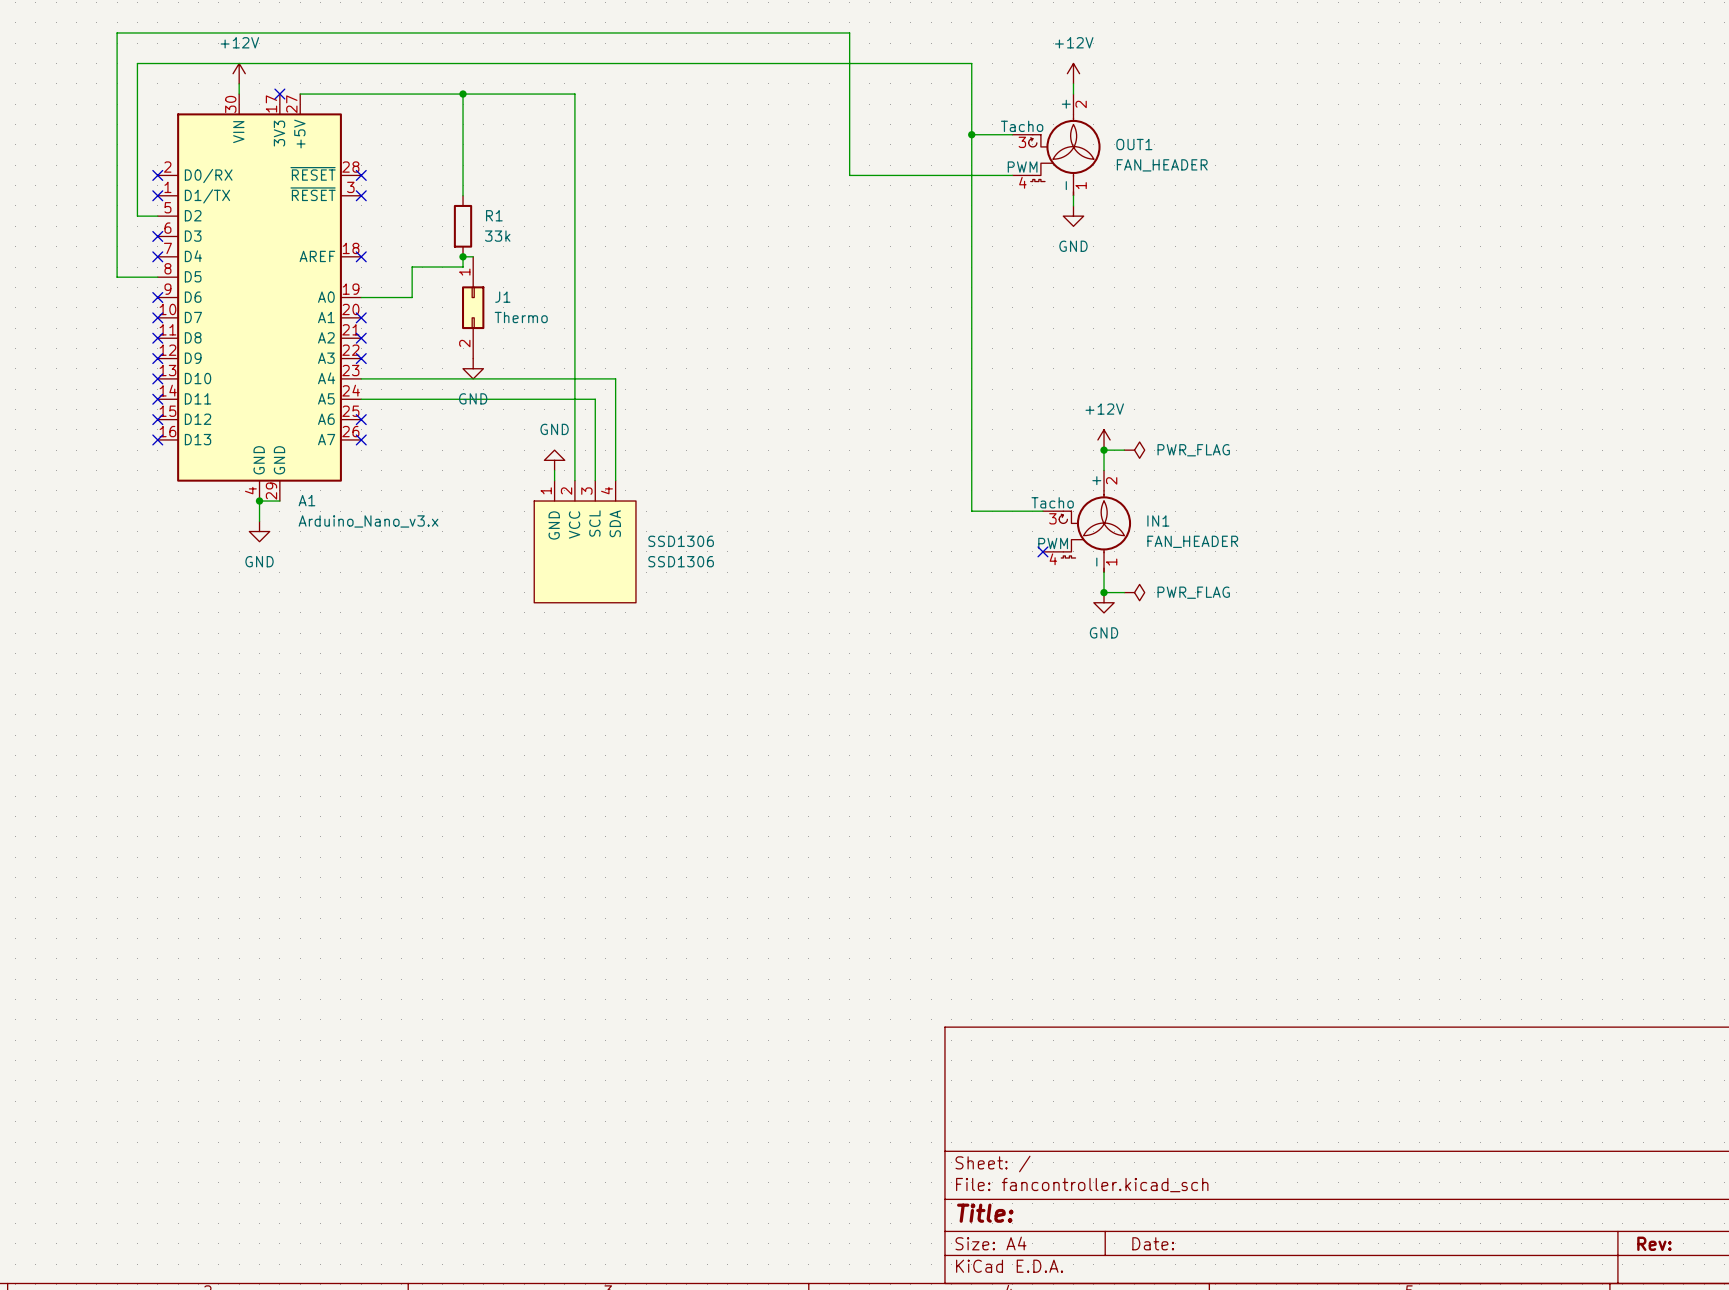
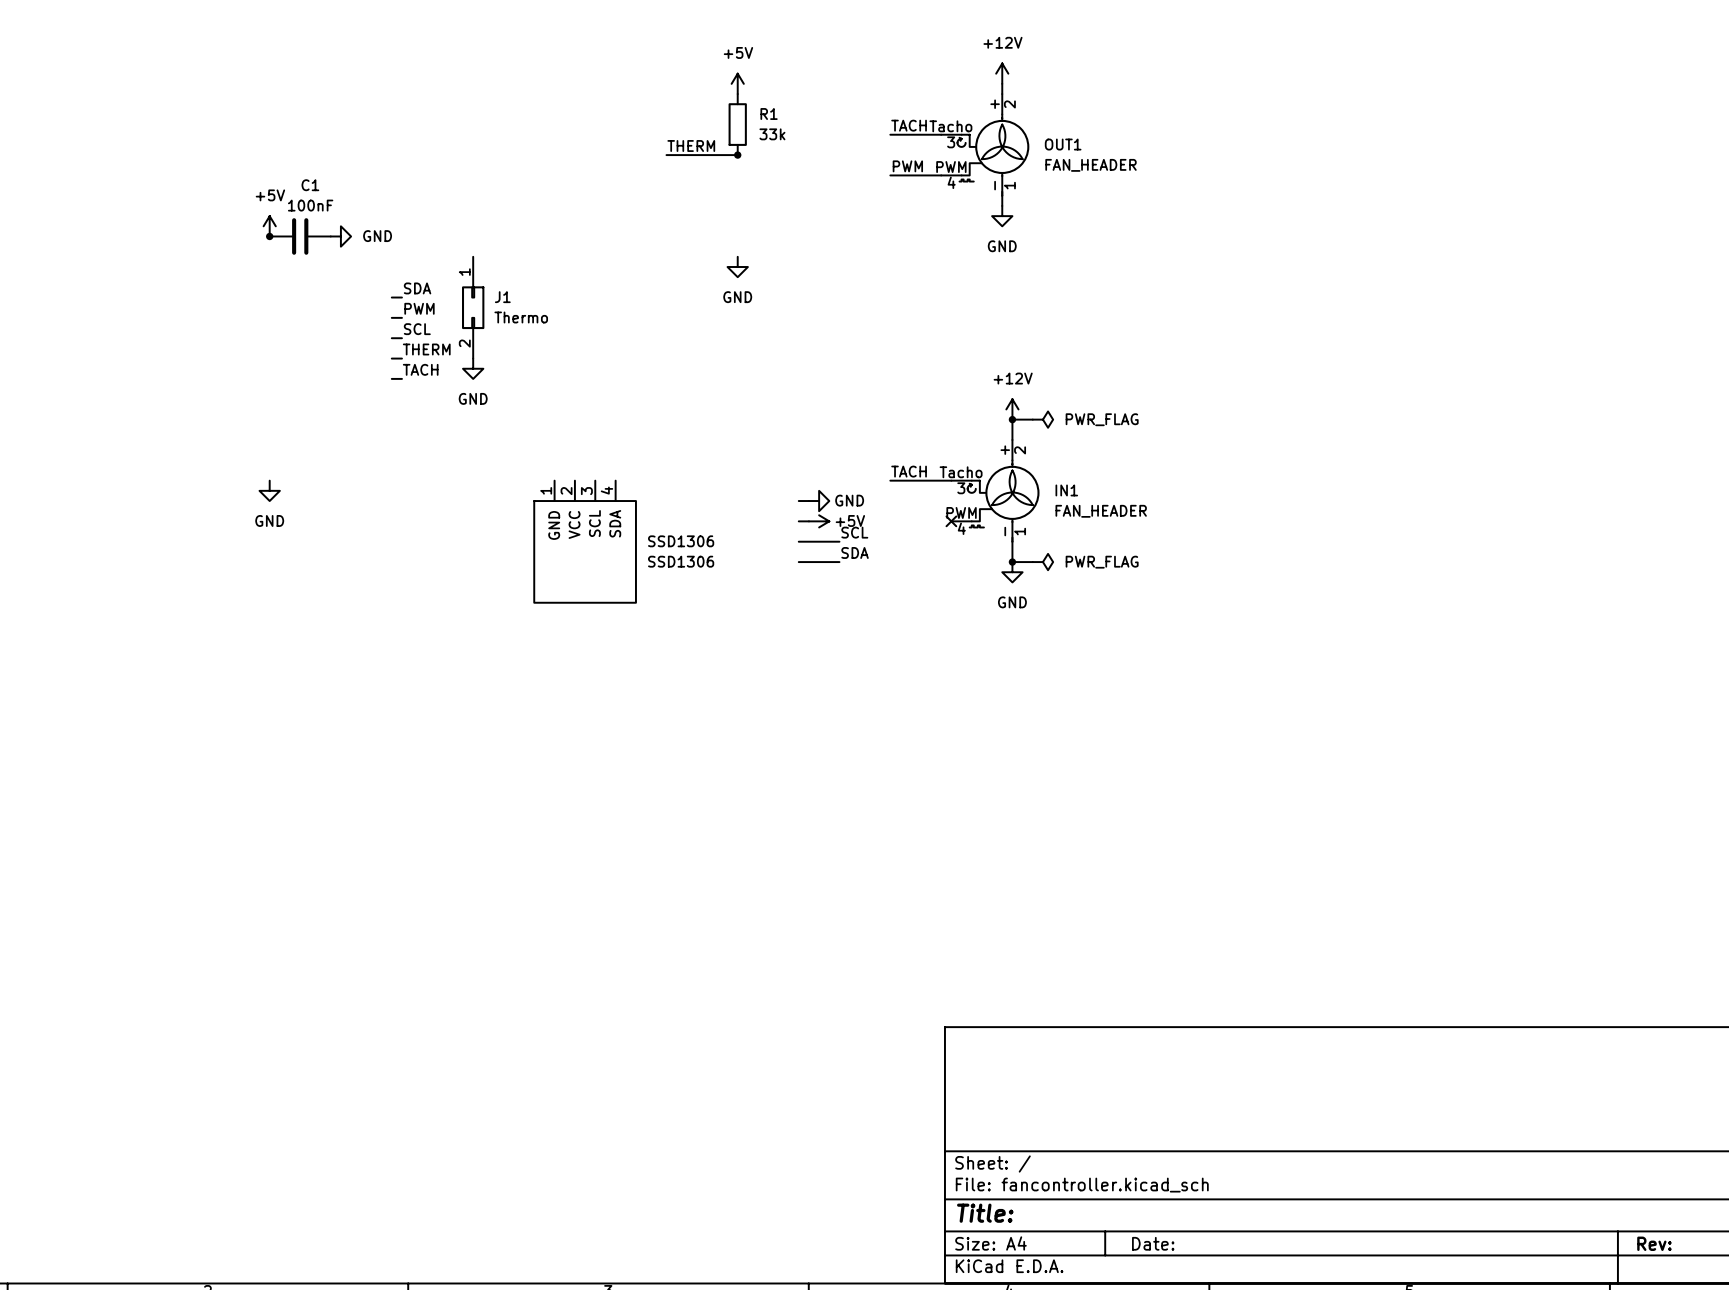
power symbol: +12V (239, 73) -> none
power symbol position: +12V (1073, 73) -> +12V (1002, 73)
wire: (239, 83) (239, 94) -> none
power symbol: none -> +5V (737, 83)
wire: (1073, 83) (1073, 94) -> (1002, 83) (1002, 94)
no-connect mark: (279, 94) -> none
wire: (300, 94) (574, 94) (574, 480) -> none
wire: (463, 94) (463, 195) -> none
junction: (463, 94) -> none
label: none -> TACH (909, 125)
wire: none -> (890, 134) (941, 134)
wire: (971, 134) (1012, 134) -> none
junction: (971, 134) -> none
OUT1 position: (1056, 144) -> (985, 144)
label: none -> THERM (691, 146)
wire: none -> (666, 155) (737, 155)
junction: none -> (737, 155)
label: none -> PWM (907, 166)
no-connect mark: (157, 175) -> none
no-connect mark: (361, 175) -> none
wire: (890, 175) (849, 175) (849, 32) (117, 32) (117, 277) (157, 277) -> none
wire: (941, 175) (1012, 175) -> none
no-connect mark: (157, 195) -> none
no-connect mark: (361, 195) -> none
wire: (1073, 195) (1073, 205) -> (1002, 195) (1002, 205)
wire: (157, 216) (137, 216) (137, 63) (971, 63) (971, 511) (1042, 511) -> none
power symbol position: GND (1073, 216) -> GND (1002, 216)
power symbol: none -> +5V (269, 226)
R1 position: (463, 226) -> (737, 124)
no-connect mark: (157, 236) -> none
junction: none -> (269, 236)
C1: none -> 100nF (300, 236)
power symbol: none -> GND (340, 236)
no-connect mark: (157, 256) -> none
no-connect mark: (361, 256) -> none
junction: (463, 256) -> none
wire: (473, 256) (463, 256) (463, 267) (412, 267) (412, 297) (401, 297) -> none
power symbol: none -> GND (737, 267)
label: none -> SDA (417, 288)
no-connect mark: (157, 297) -> none
A1: Arduino_Nano_v3.x (259, 297) -> none
wire: (361, 297) (391, 297) -> none
label: none -> PWM (419, 308)
no-connect mark: (157, 317) -> none
no-connect mark: (361, 317) -> none
wire: none -> (391, 317) (401, 317)
label: none -> SCL (417, 329)
no-connect mark: (157, 338) -> none
no-connect mark: (361, 338) -> none
wire: none -> (391, 338) (401, 338)
label: none -> THERM (426, 349)
no-connect mark: (157, 358) -> none
no-connect mark: (361, 358) -> none
wire: none -> (391, 358) (401, 358)
label: none -> TACH (420, 369)
no-connect mark: (157, 378) -> none
wire: (361, 378) (391, 378) -> none
wire: (401, 378) (615, 378) (615, 480) -> none
no-connect mark: (157, 399) -> none
wire: (361, 399) (595, 399) (595, 480) -> none
no-connect mark: (157, 419) -> none
no-connect mark: (361, 419) -> none
junction: none -> (1012, 419)
power symbol: none -> PWR_FLAG (1042, 419)
no-connect mark: (157, 439) -> none
no-connect mark: (361, 439) -> none
power symbol position: +12V (1104, 439) -> +12V (1012, 409)
junction: (1104, 450) -> none
wire: (1124, 450) (1104, 450) (1104, 470) -> (1032, 419) (1012, 419) (1012, 439)
power symbol: PWR_FLAG (1134, 450) -> none
power symbol: GND (554, 460) -> none
wire: (554, 470) (554, 480) -> none
label: none -> TACH (909, 471)
wire: none -> (890, 480) (951, 480)
junction: (259, 501) -> none
wire: (279, 501) (259, 501) (259, 521) -> none
wire: none -> (798, 501) (808, 501)
power symbol: none -> GND (819, 501)
wire: none -> (798, 521) (808, 521)
power symbol: none -> +5V (819, 521)
no-connect mark: none -> (951, 521)
IN1 position: (1087, 521) -> (995, 490)
power symbol position: GND (259, 531) -> GND (269, 490)
label: none -> SCL (854, 532)
wire: none -> (798, 541) (839, 541)
no-connect mark: (1042, 551) -> none
label: none -> SDA (855, 552)
wire: none -> (798, 562) (839, 562)
junction: none -> (1012, 562)
power symbol: none -> PWR_FLAG (1042, 562)
wire: (1104, 572) (1104, 592) (1124, 592) -> (1012, 541) (1012, 562) (1032, 562)
junction: (1104, 592) -> none
power symbol: PWR_FLAG (1134, 592) -> none
power symbol position: GND (1104, 602) -> GND (1012, 572)

